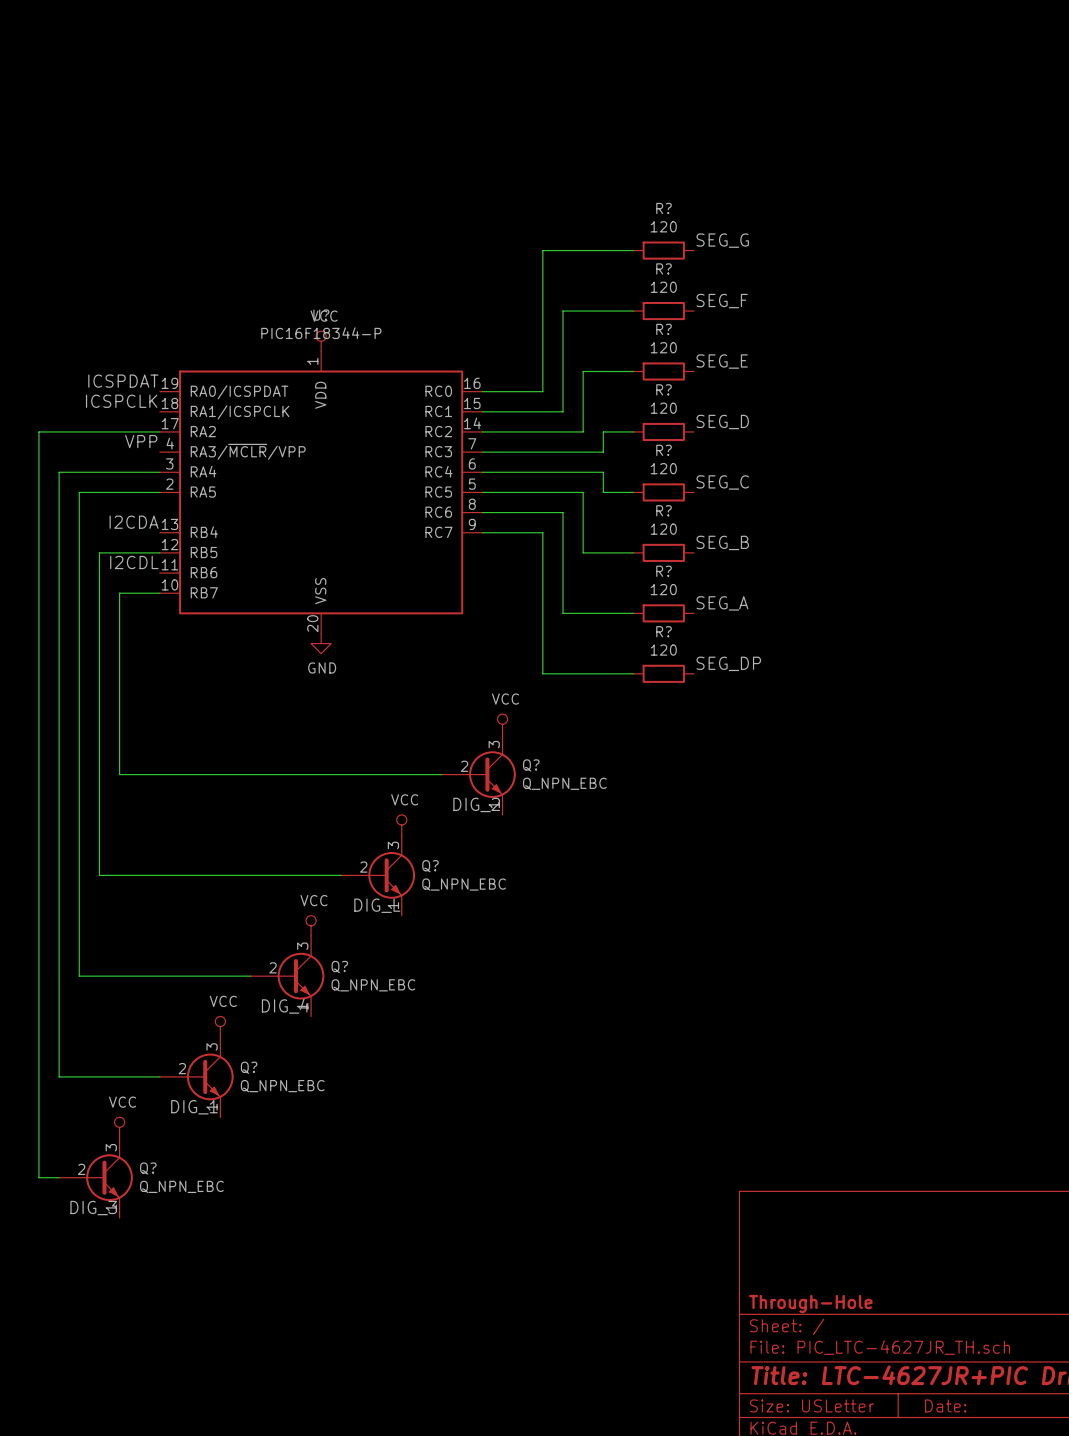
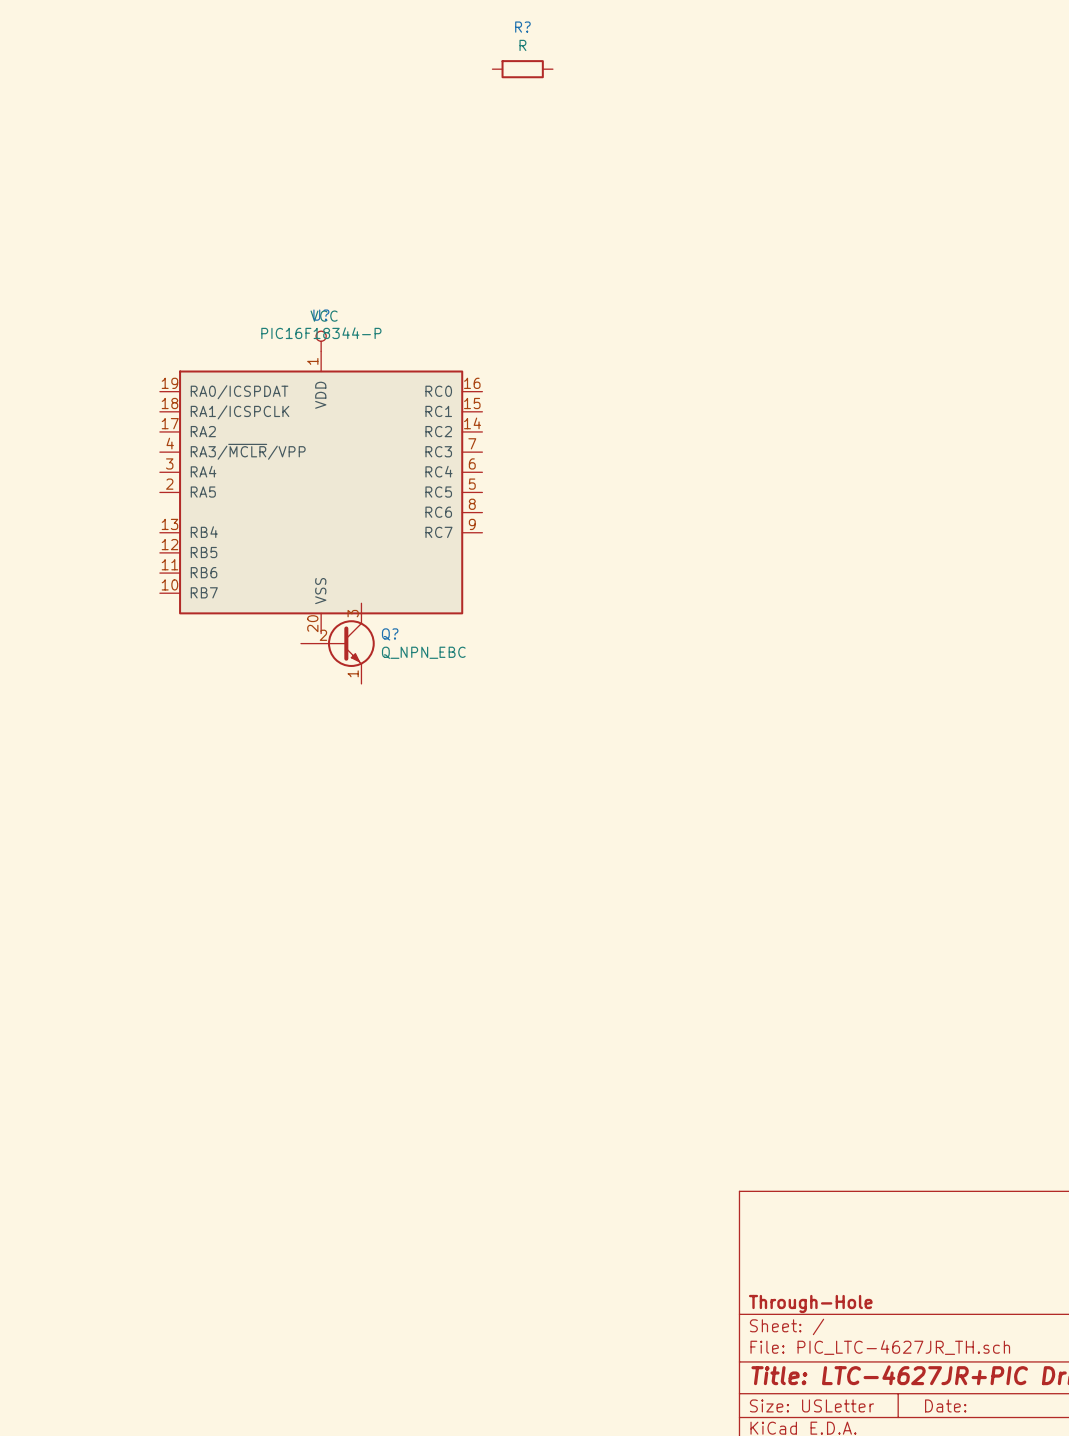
R?: none -> R (522, 69)
label: SEG_G (722, 240) -> none
wire: (633, 250) (542, 250) (542, 391) (482, 391) -> none
R?: 120 (663, 250) -> none
label: SEG_F (722, 301) -> none
wire: (633, 311) (563, 311) (563, 411) (482, 411) -> none
R?: 120 (663, 311) -> none
label: SEG_E (722, 361) -> none
wire: (633, 371) (583, 371) (583, 431) (482, 431) -> none
R?: 120 (663, 371) -> none
label: ICSPDAT (123, 381) -> none
label: ICSPCLK (121, 401) -> none
label: SEG_D (722, 421) -> none
wire: (159, 431) (38, 431) (38, 1177) (59, 1177) -> none
wire: (633, 431) (603, 431) (603, 452) (482, 452) -> none
R?: 120 (663, 431) -> none
label: VPP (141, 441) -> none
wire: (159, 472) (59, 472) (59, 1076) (159, 1076) -> none
wire: (482, 472) (603, 472) (603, 492) (633, 492) -> none
label: SEG_C (722, 482) -> none
wire: (159, 492) (79, 492) (79, 976) (250, 976) -> none
wire: (482, 492) (583, 492) (583, 552) (633, 552) -> none
R?: 120 (663, 492) -> none
wire: (482, 512) (563, 512) (563, 613) (633, 613) -> none
label: I2CDA (134, 522) -> none
wire: (482, 532) (542, 532) (542, 673) (633, 673) -> none
label: SEG_B (722, 542) -> none
wire: (159, 552) (99, 552) (99, 875) (341, 875) -> none
R?: 120 (663, 552) -> none
label: I2CDL (134, 562) -> none
wire: (159, 593) (119, 593) (119, 774) (442, 774) -> none
label: SEG_A (722, 603) -> none
R?: 120 (663, 613) -> none
power symbol: GND (321, 643) -> none
Q?: none -> Q_NPN_EBC (337, 643)
label: SEG_DP (728, 663) -> none
R?: 120 (663, 673) -> none
power symbol: VCC (502, 724) -> none
Q?: Q_NPN_EBC (478, 774) -> none
label: DIG_2 (476, 804) -> none
power symbol: VCC (401, 824) -> none
Q?: Q_NPN_EBC (378, 875) -> none
label: DIG_L (377, 905) -> none
power symbol: VCC (311, 925) -> none
Q?: Q_NPN_EBC (287, 976) -> none
label: DIG_4 (285, 1006) -> none
power symbol: VCC (220, 1026) -> none
Q?: Q_NPN_EBC (196, 1076) -> none
label: DIG_1 (194, 1107) -> none
power symbol: VCC (119, 1127) -> none
Q?: Q_NPN_EBC (96, 1177) -> none
label: DIG_3 (93, 1208) -> none

